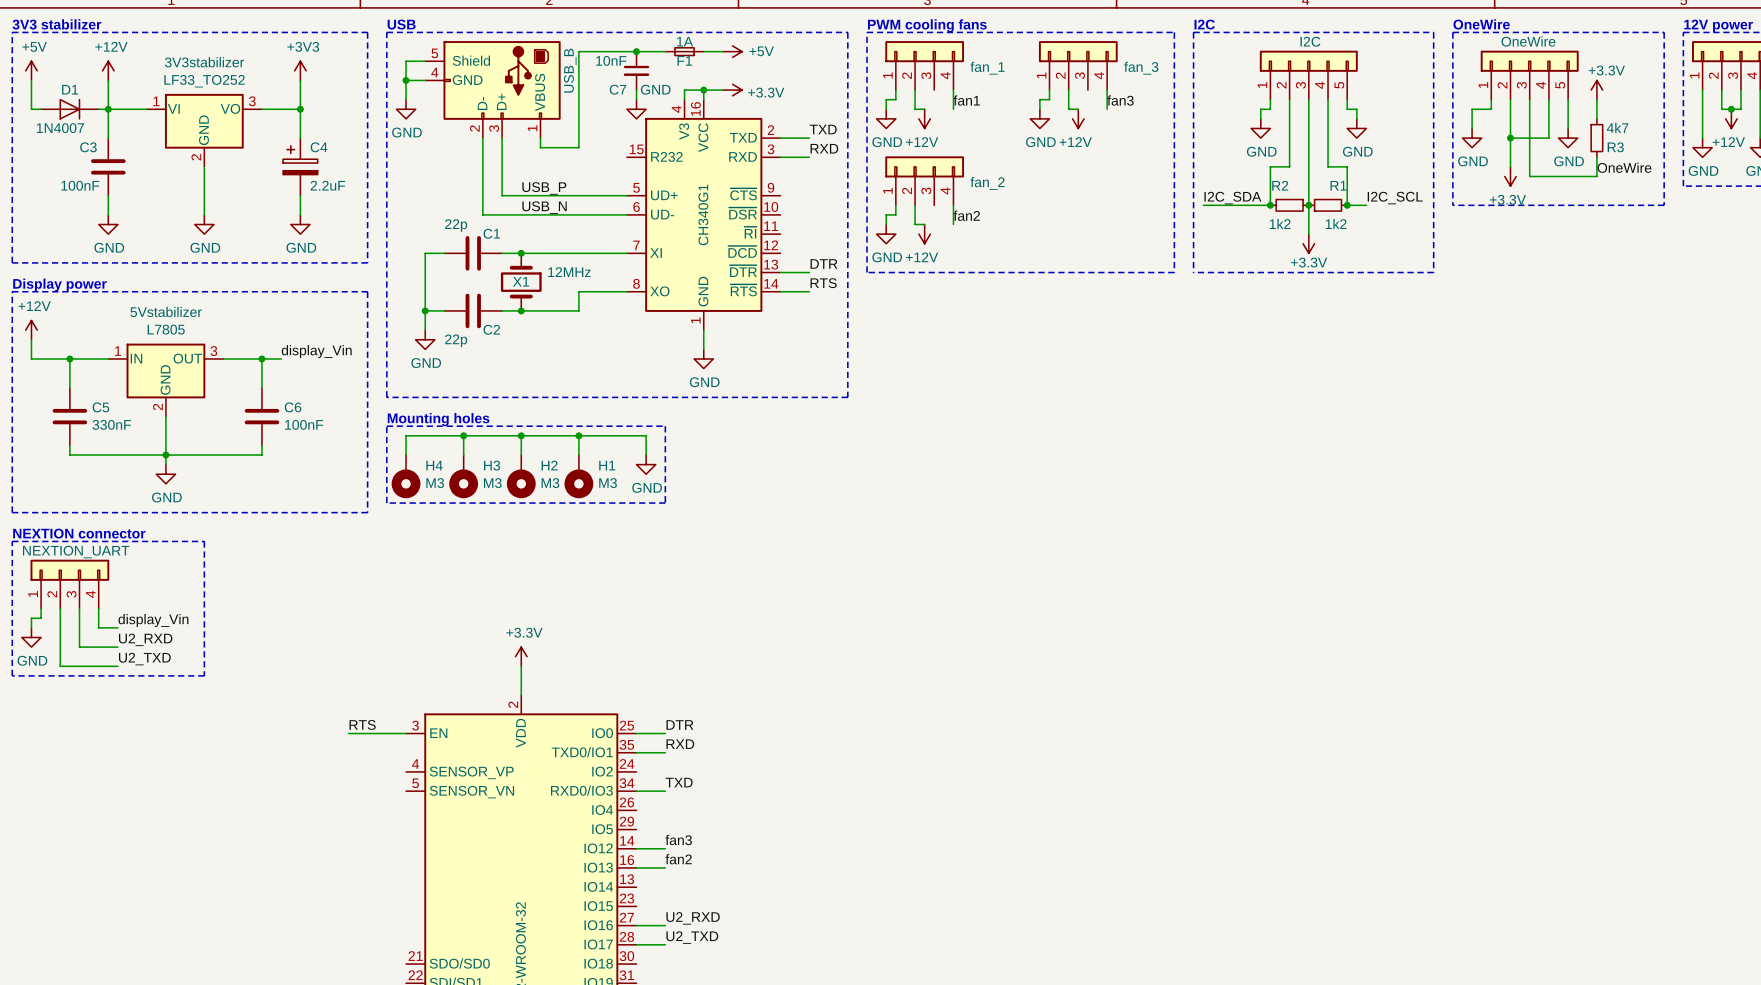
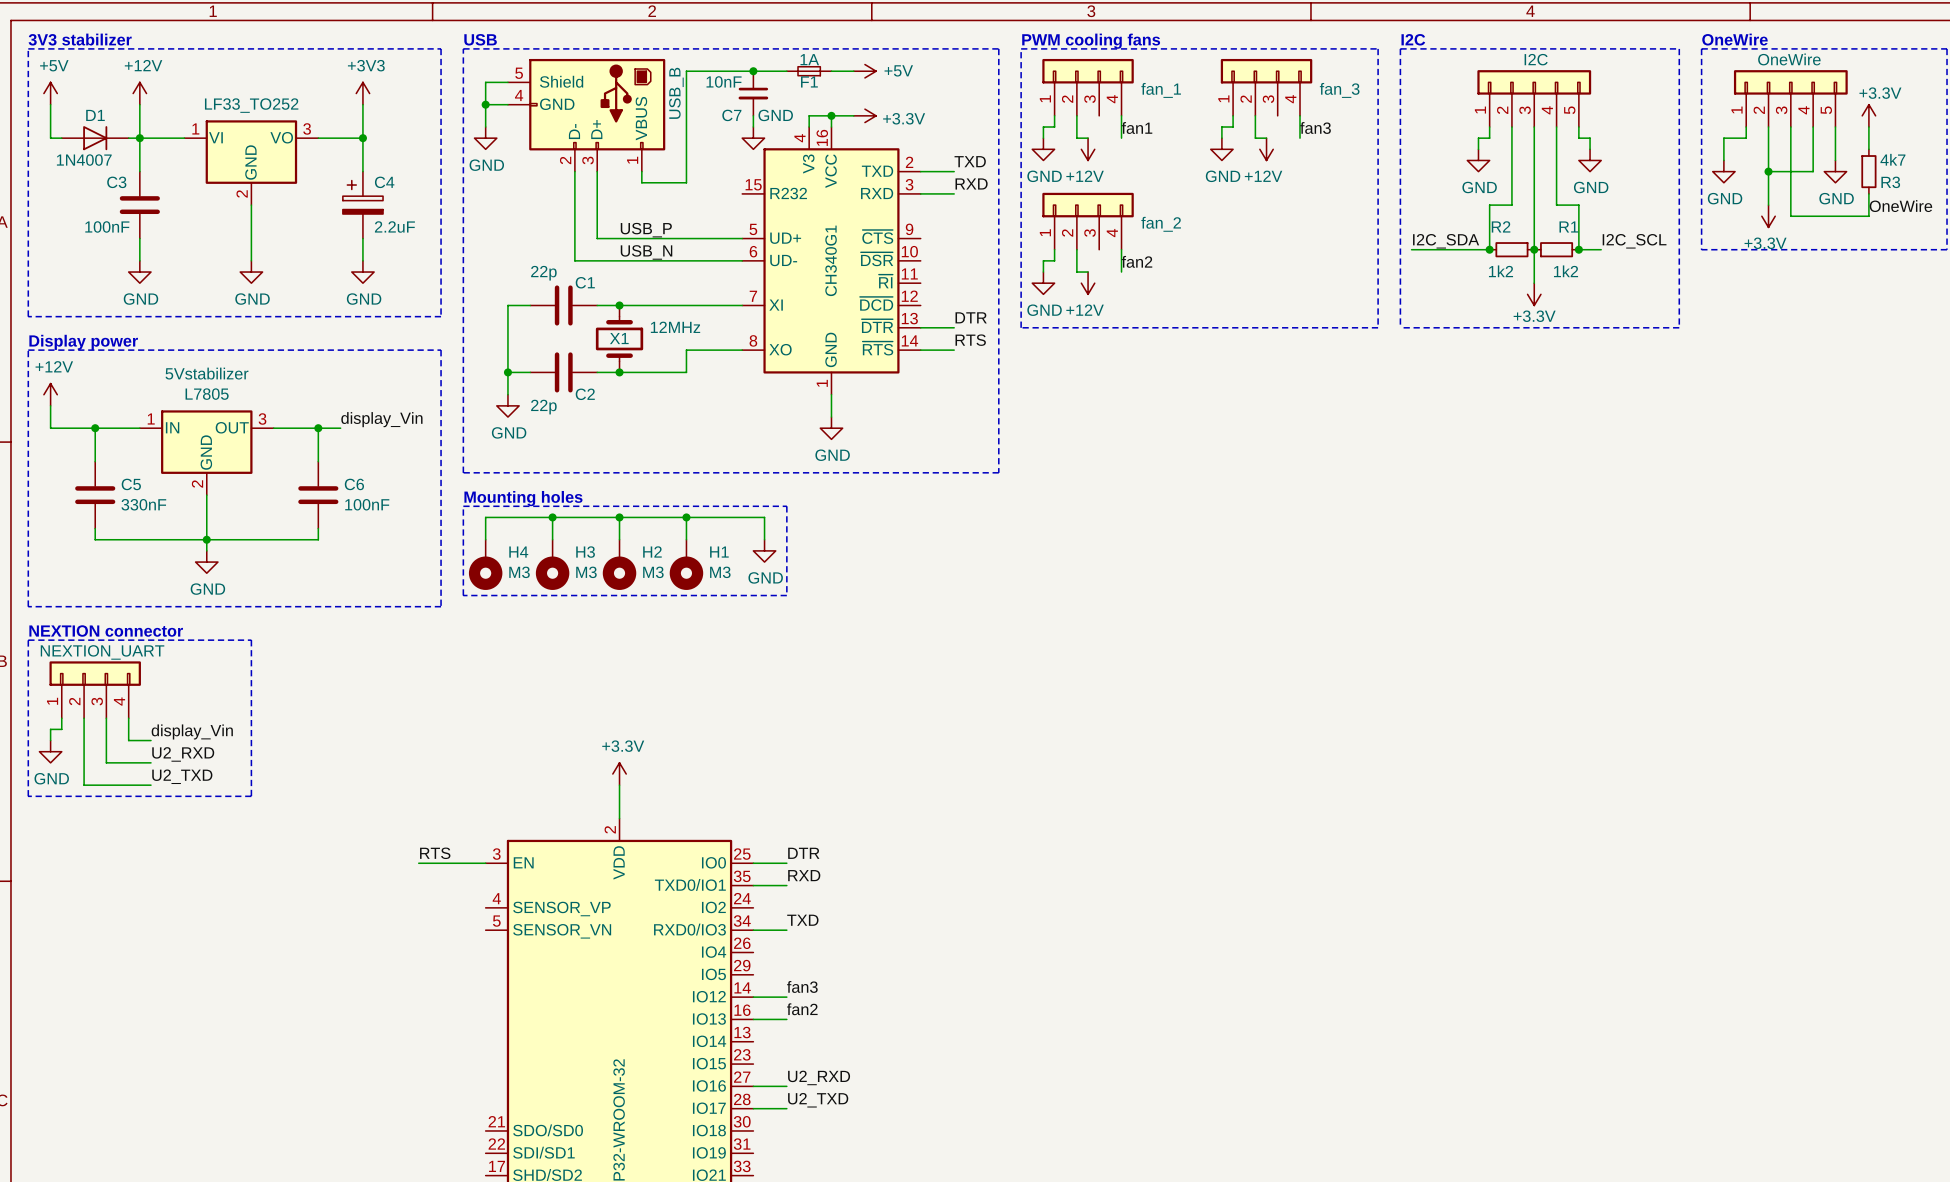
3V3stabilizer name: 3V3stabilizer (204, 62) -> none

